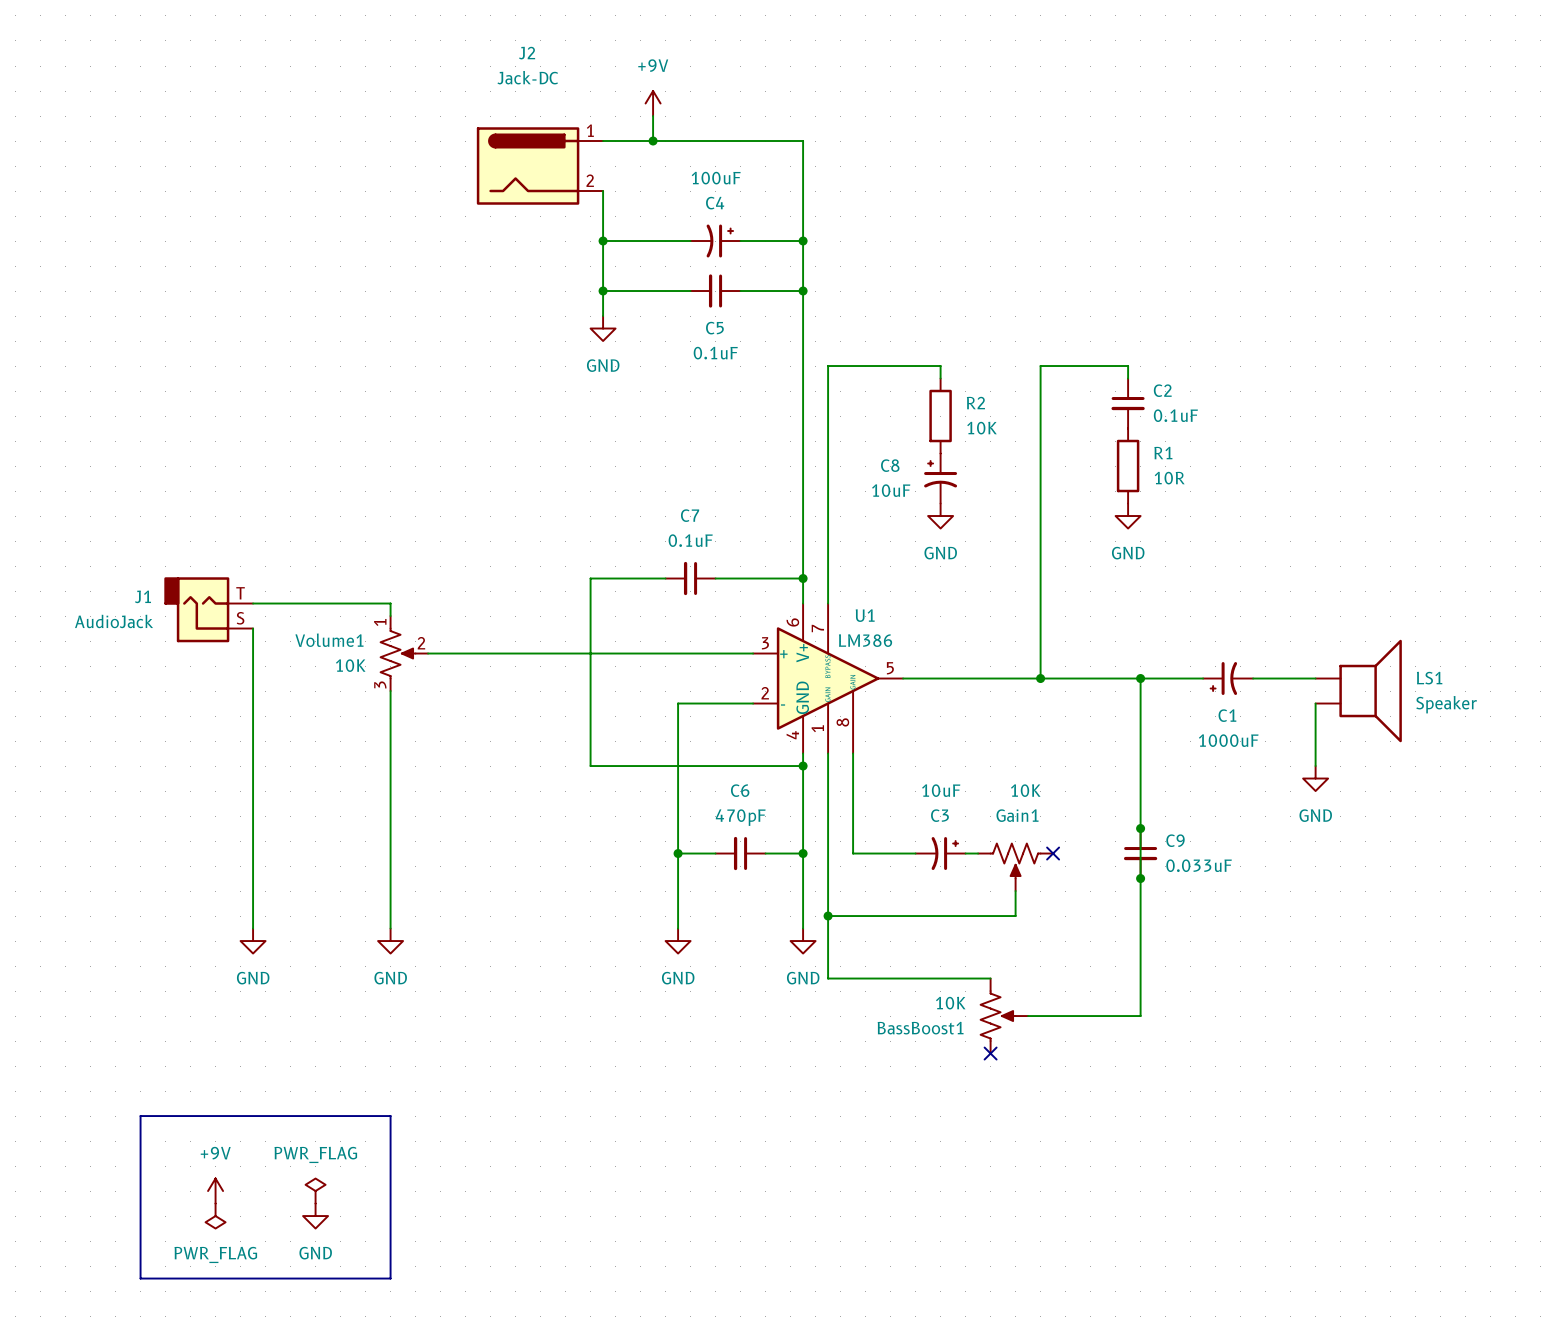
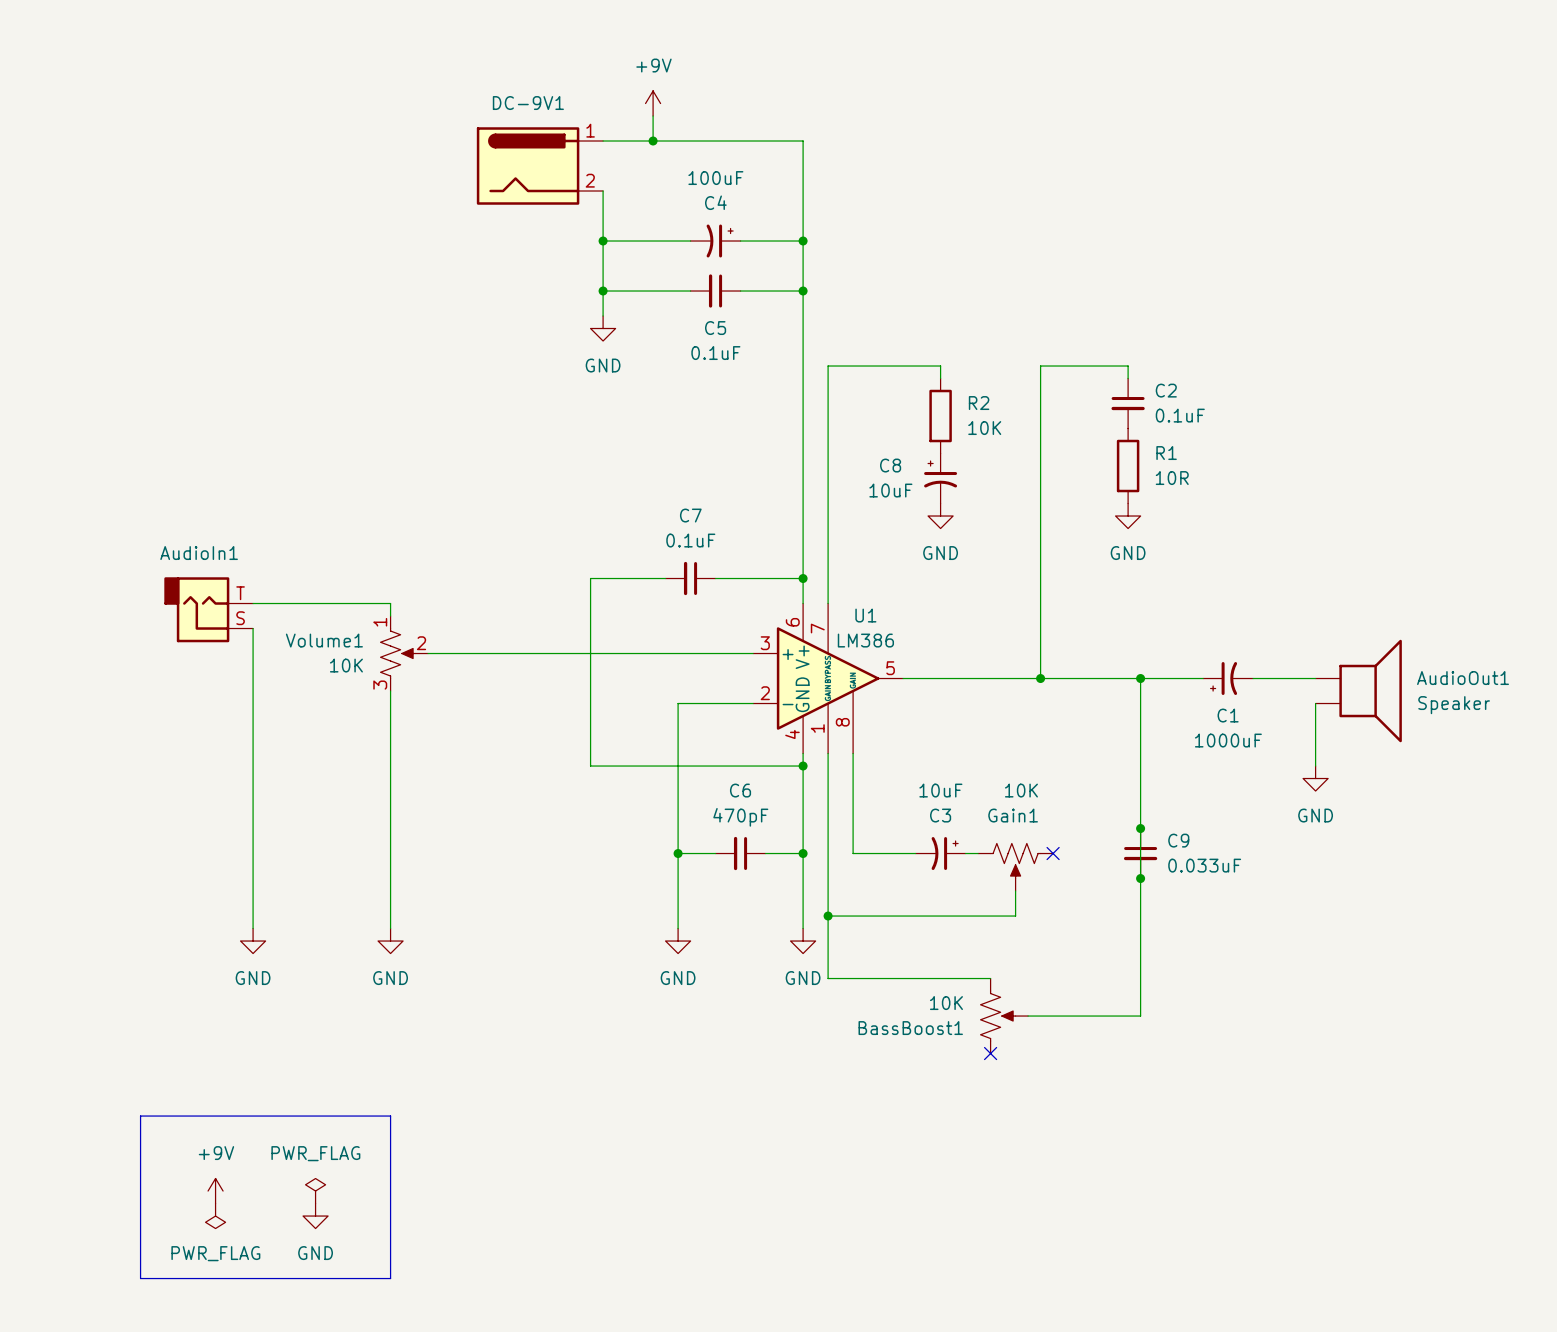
J2 name: J2 (527, 53) -> DC-9V1 (528, 103)
J2 value: Jack-DC (527, 77) -> none
J1 name: J1 (142, 596) -> AudioIn1 (199, 553)
J1 value: AudioJack (114, 621) -> none
LS1 name: LS1 (1429, 678) -> AudioOut1 (1463, 678)

